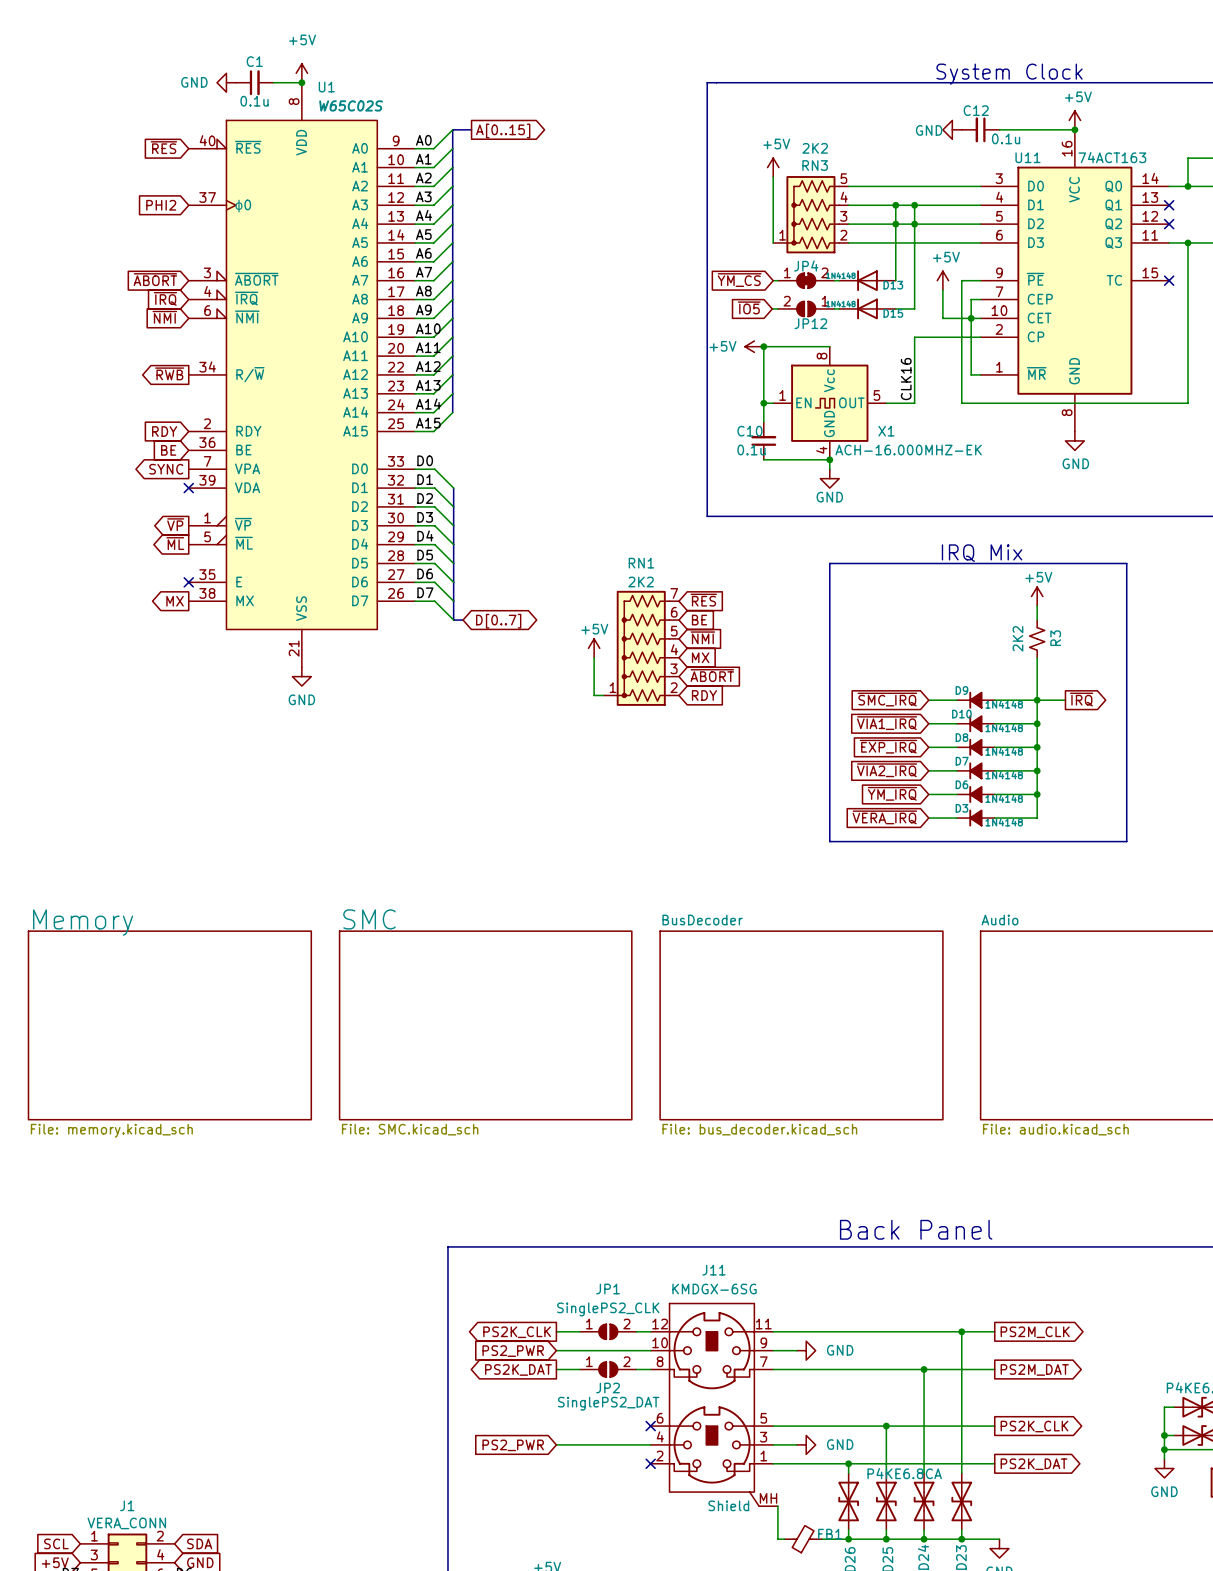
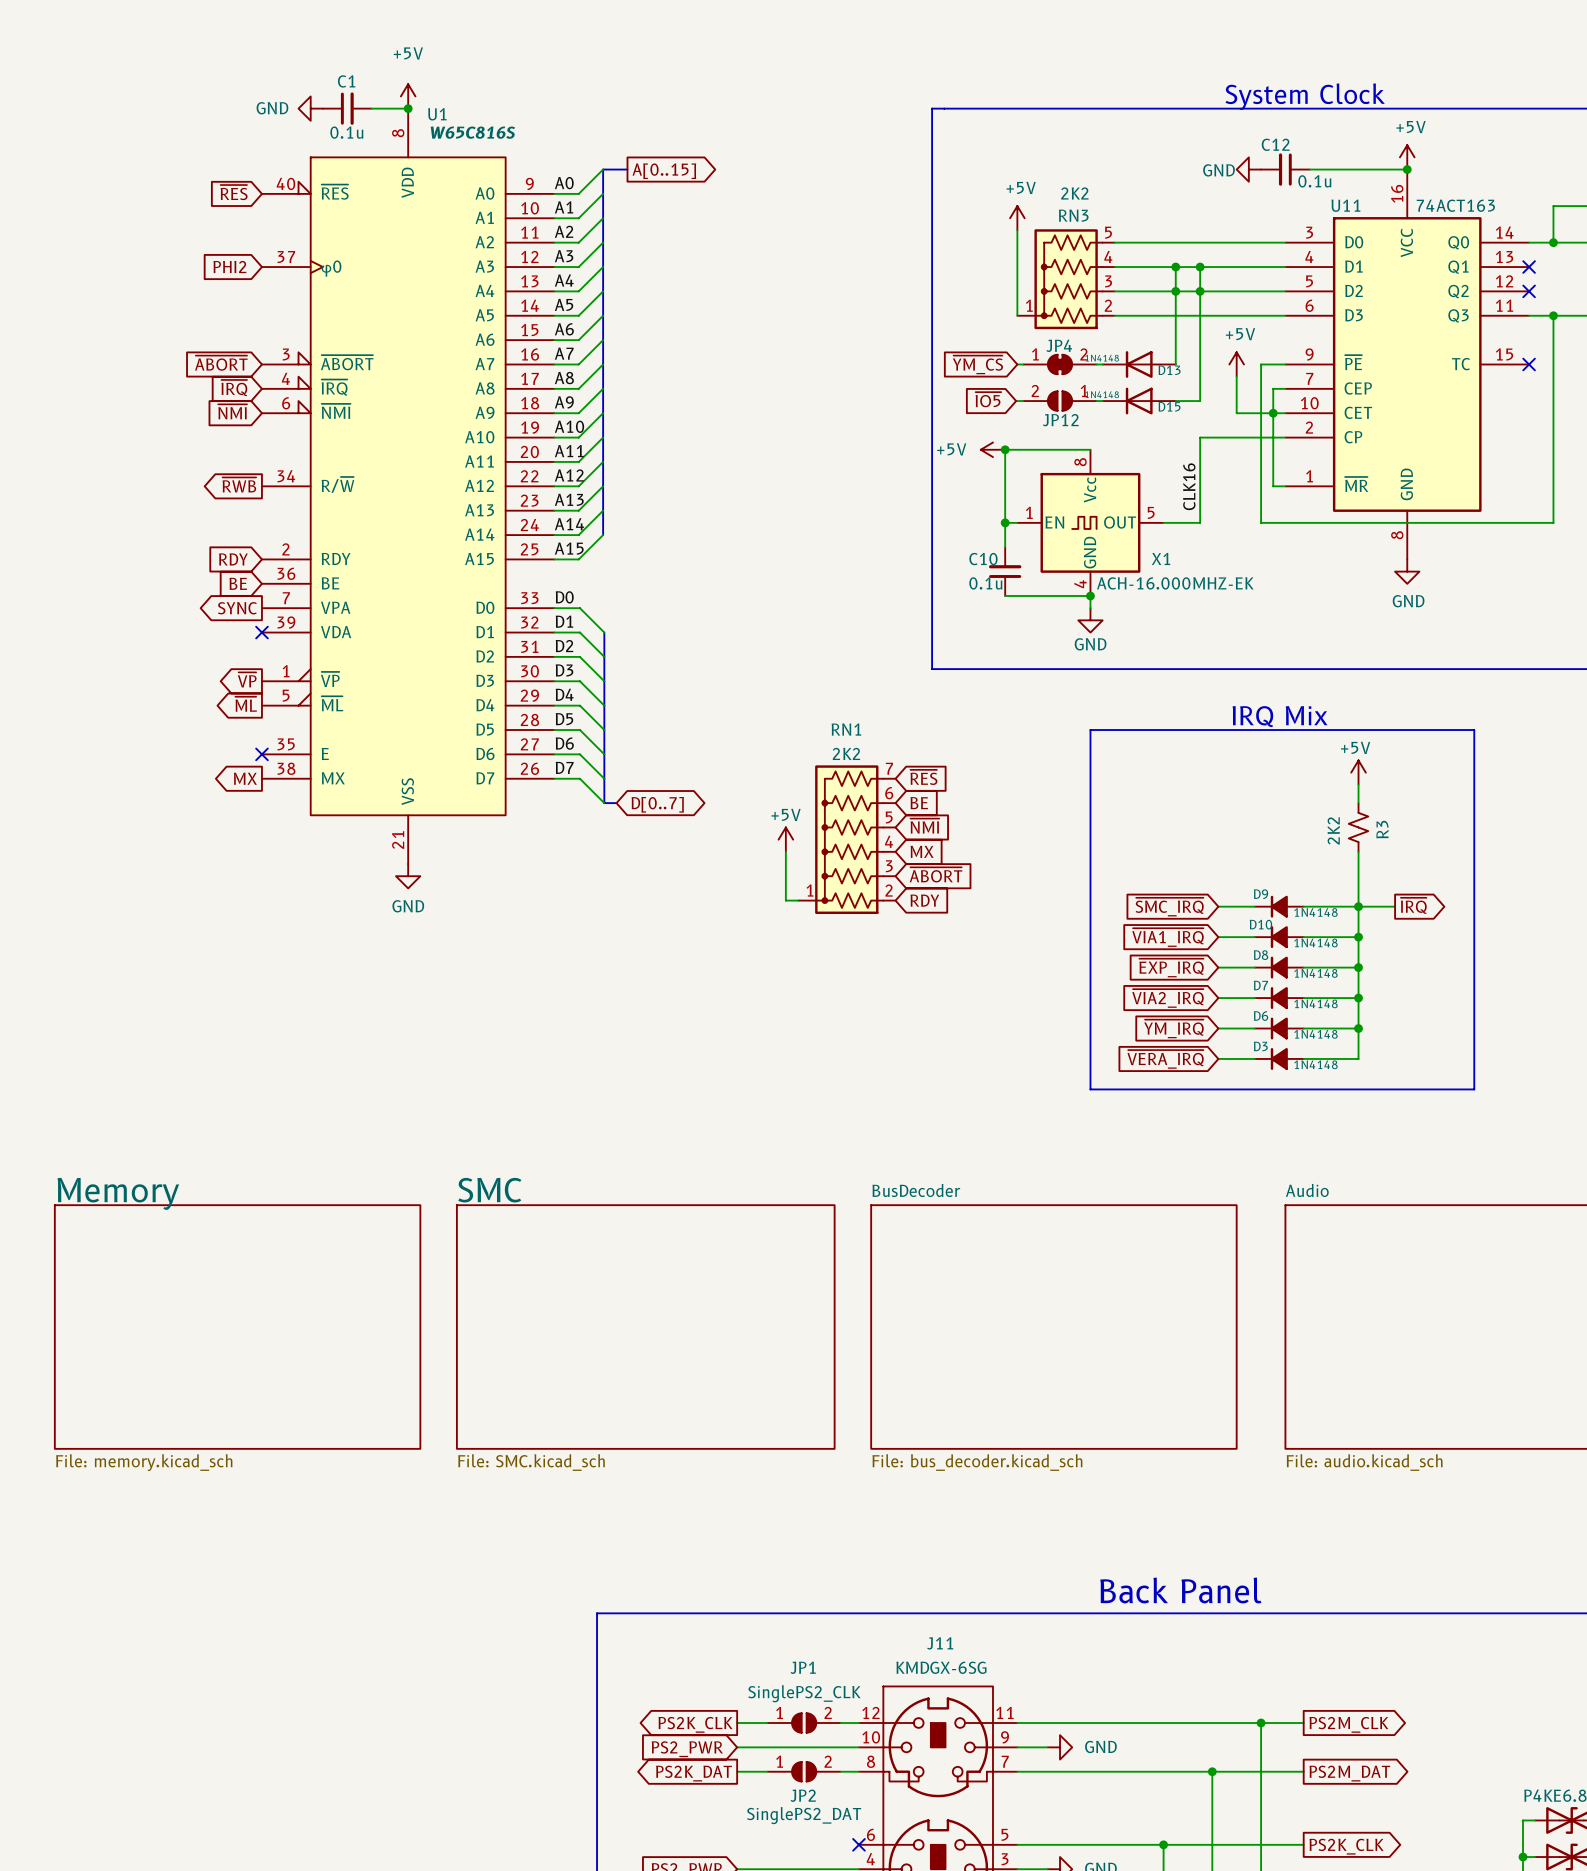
U1 value: W65C02S (351, 105) -> W65C816S (472, 132)

